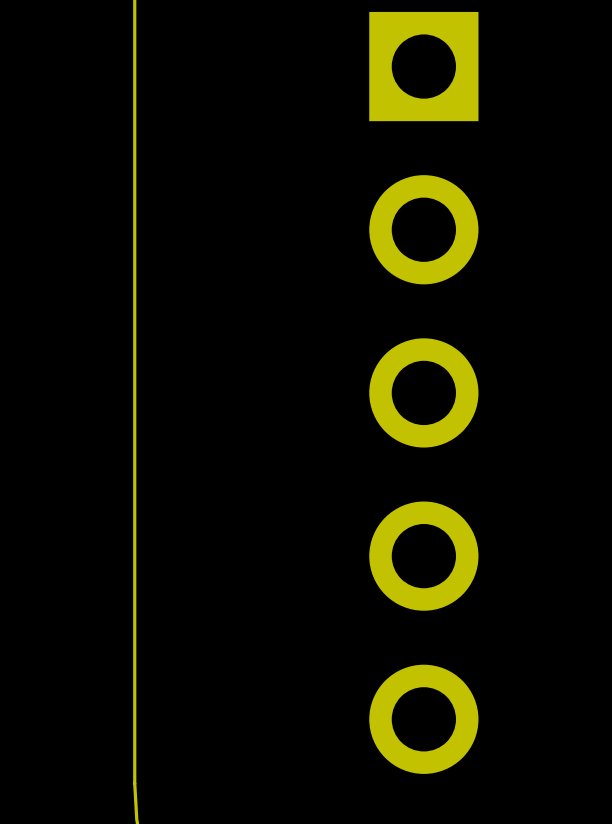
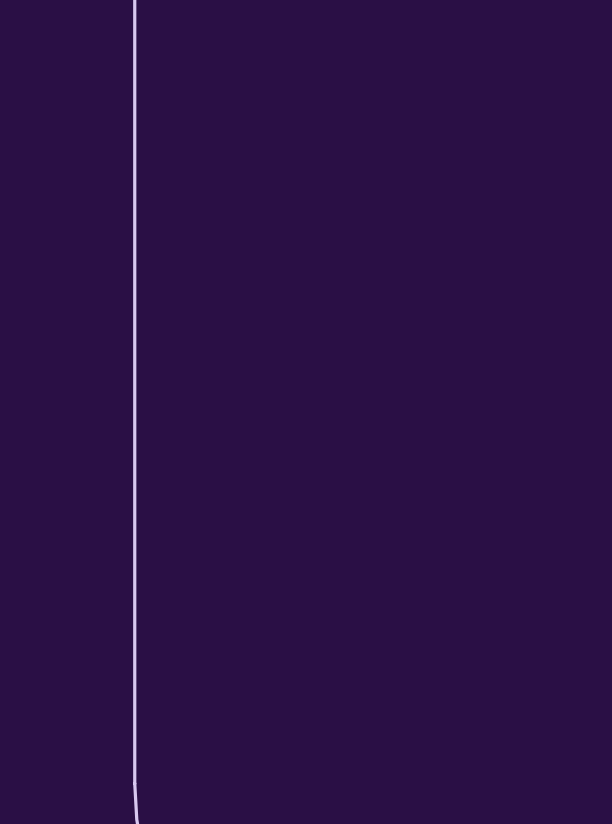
part: (423, 392) -> none

